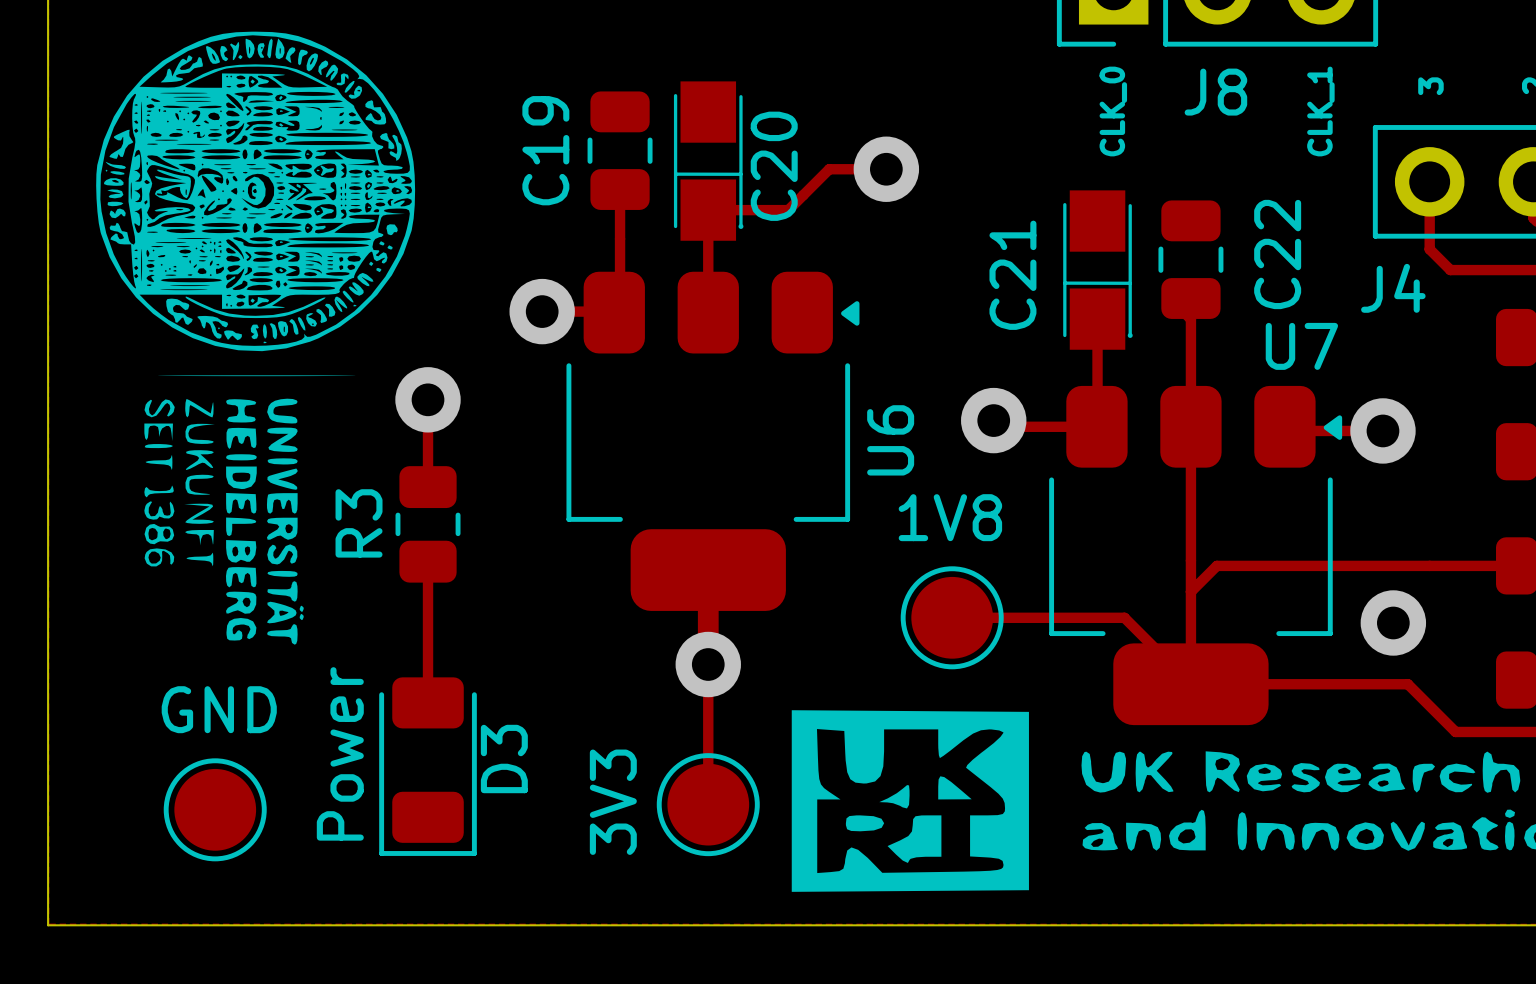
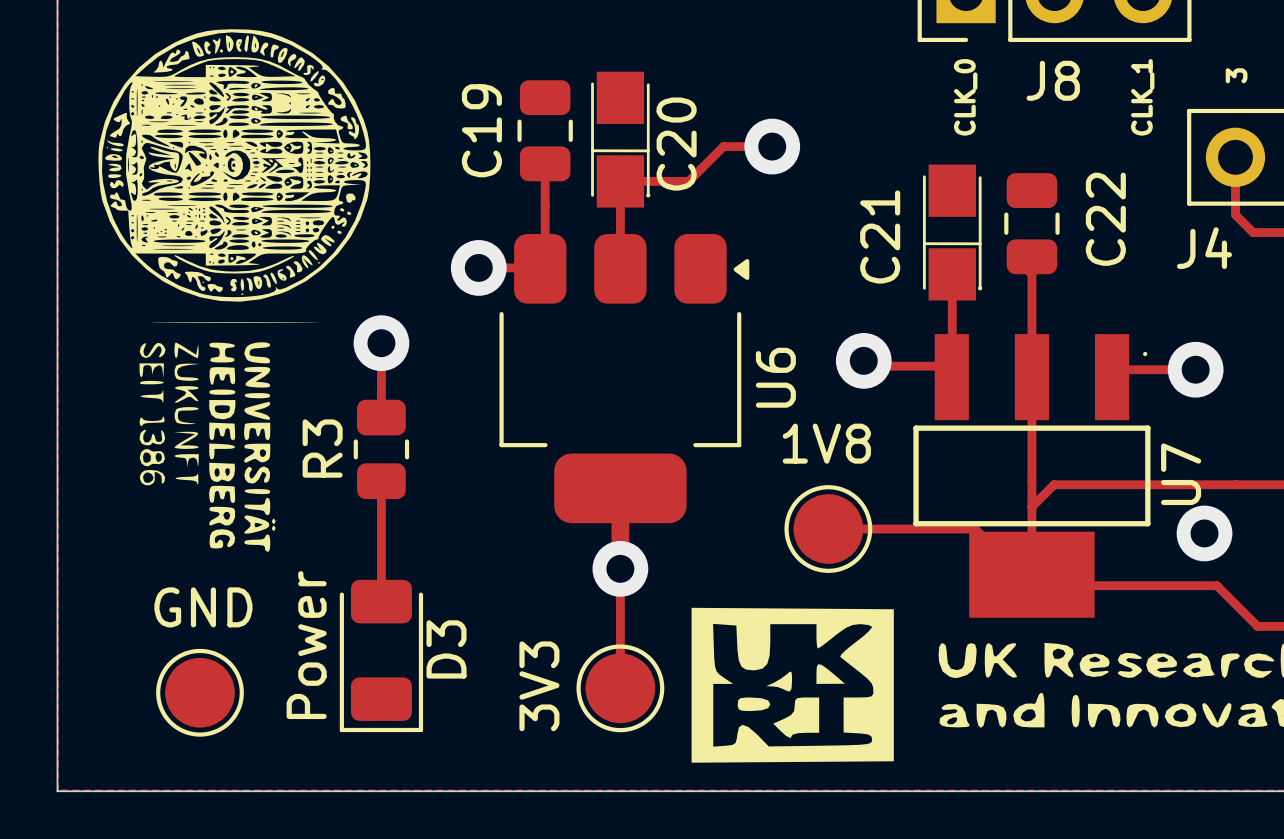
U7 name position: U7 (1301, 346) -> U7 (1181, 474)
U7 footprint: [1049, 385, 1343, 726] -> [913, 334, 1151, 618]

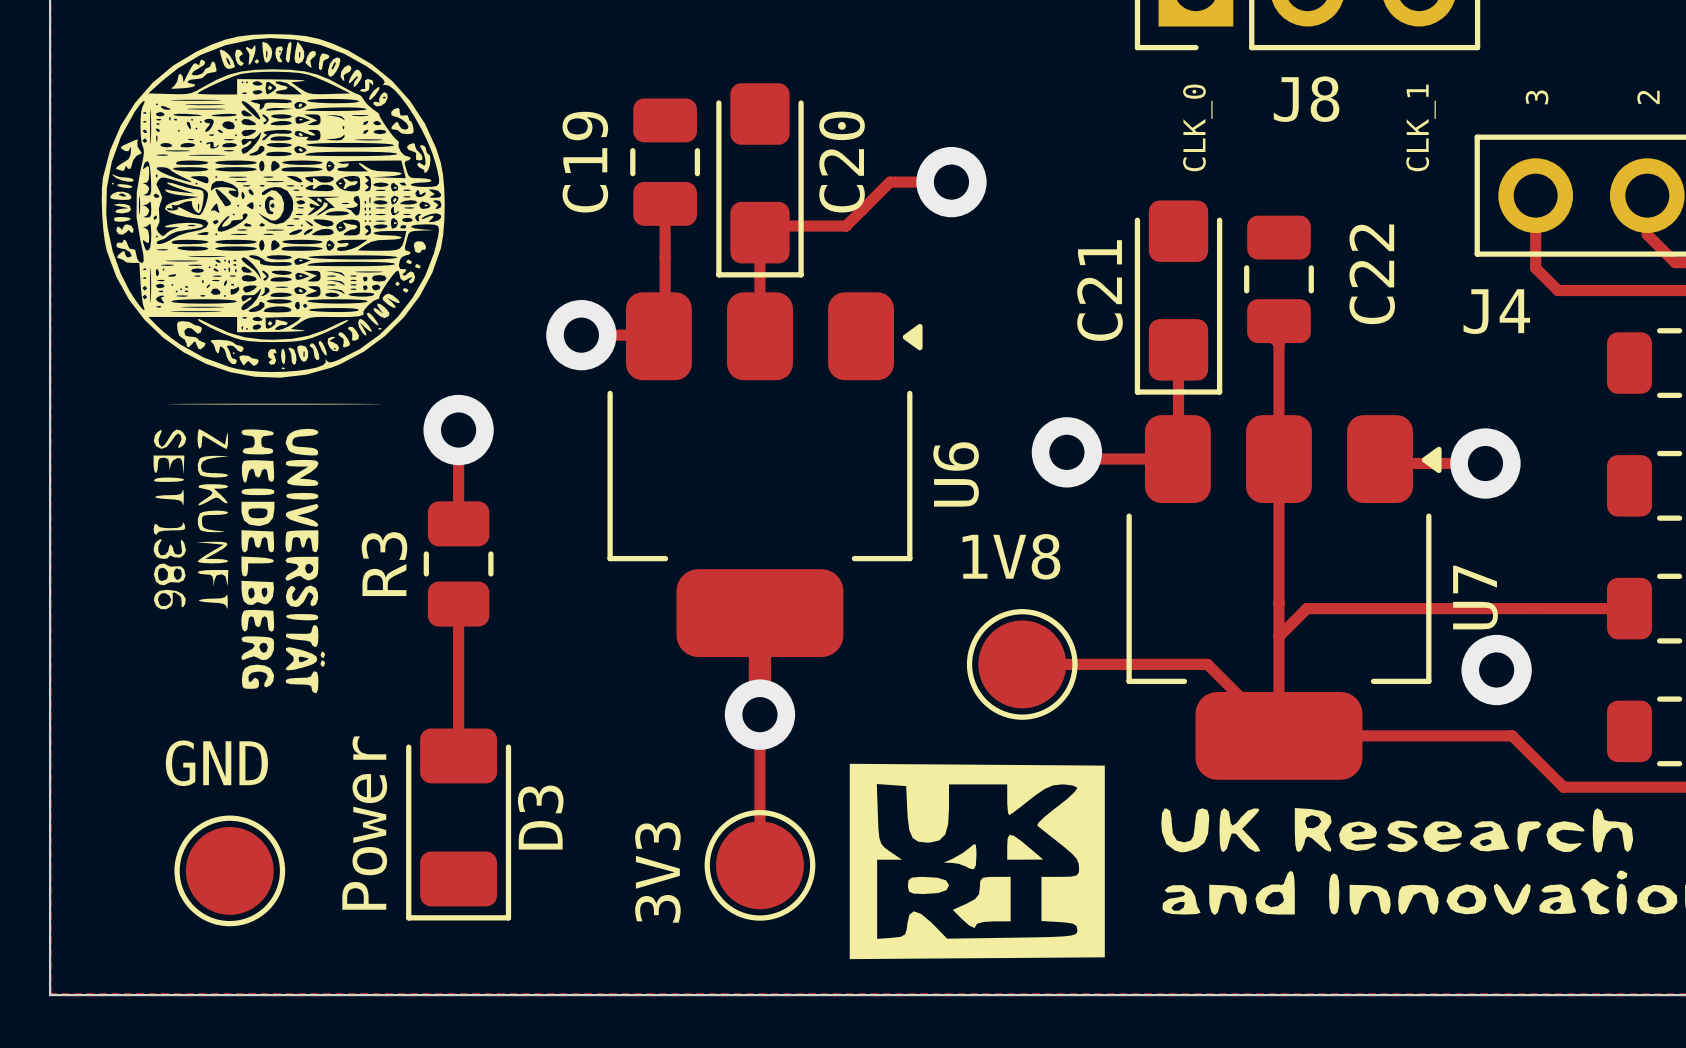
C20 footprint: [591, 71, 651, 208] -> [716, 83, 804, 278]
C21 footprint: [923, 164, 983, 301] -> [1134, 200, 1223, 395]
U7 footprint: [913, 334, 1151, 618] -> [1126, 415, 1442, 780]

